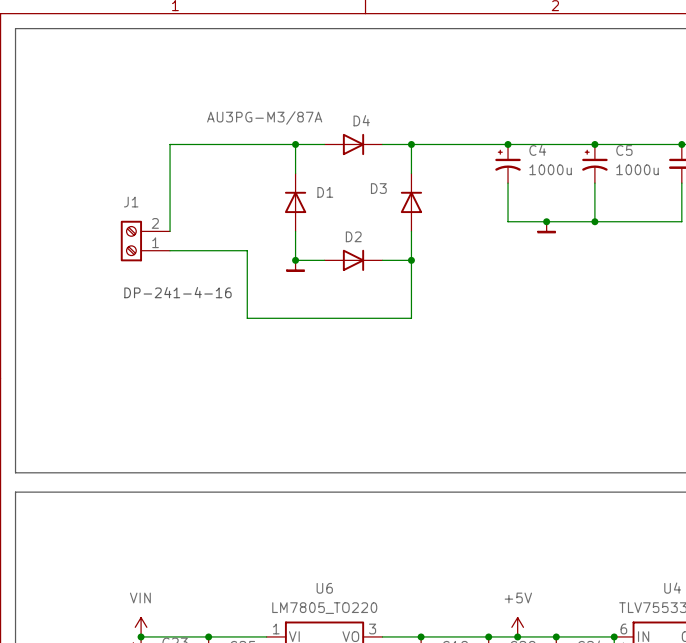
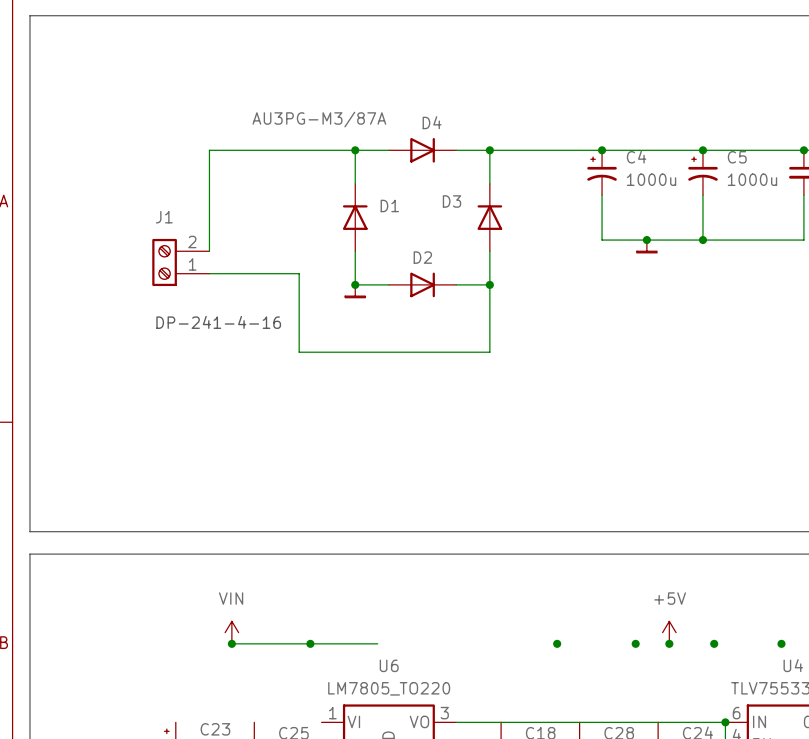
junction: none -> (231, 643)
junction: none -> (310, 643)
junction: none -> (557, 643)
junction: none -> (635, 643)
junction: none -> (669, 643)
junction: none -> (714, 643)
junction: none -> (781, 643)
power symbol position: VIN (141, 627) -> VIN (231, 632)
power symbol position: +5V (517, 627) -> +5V (669, 632)
wire: (141, 636) (266, 636) -> (231, 643) (377, 643)
junction: (141, 636) -> none
junction: (208, 636) -> none
junction: (421, 636) -> none
junction: (488, 636) -> none
junction: (517, 636) -> none
junction: (556, 636) -> none

